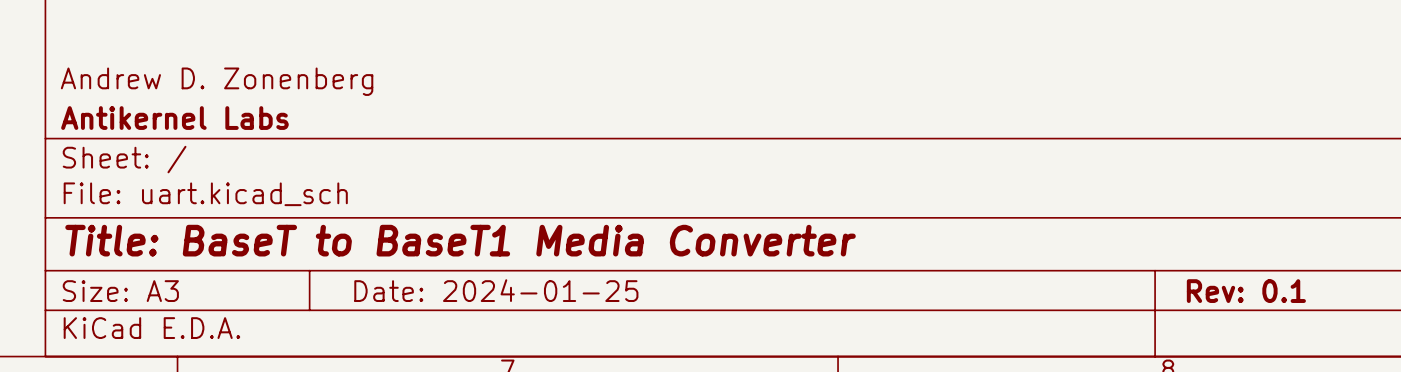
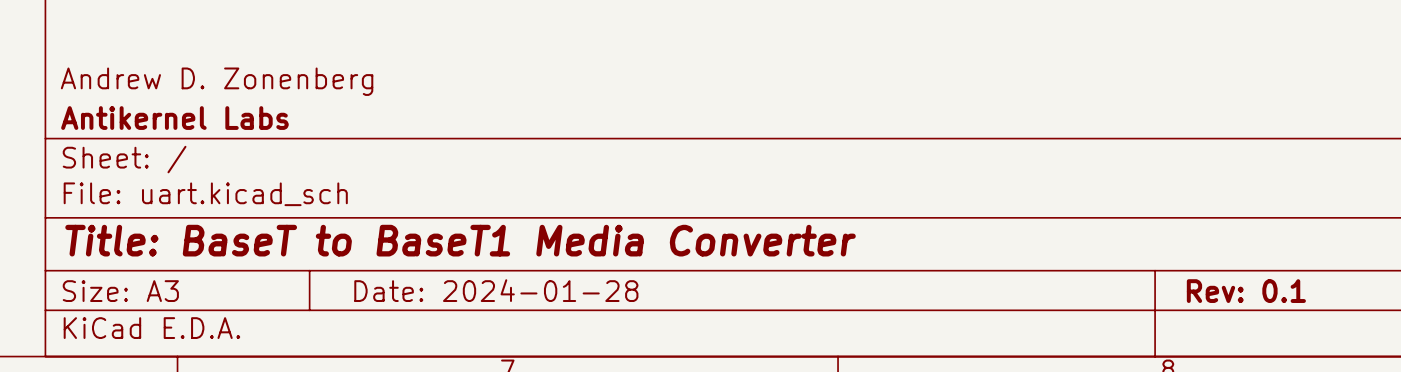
title block: Date: 2024-01-25 (496, 290) -> Date: 2024-01-28 (496, 290)

